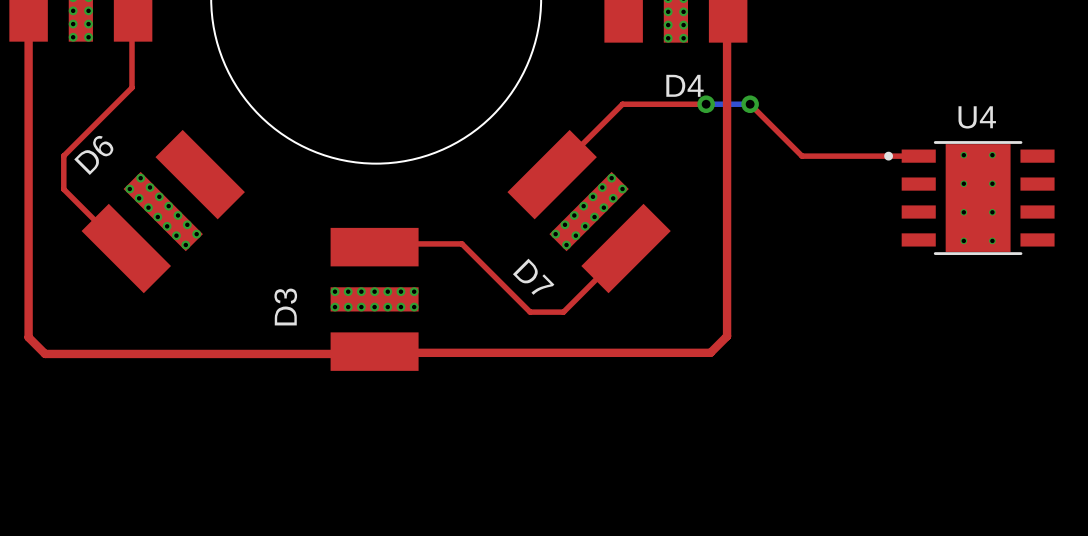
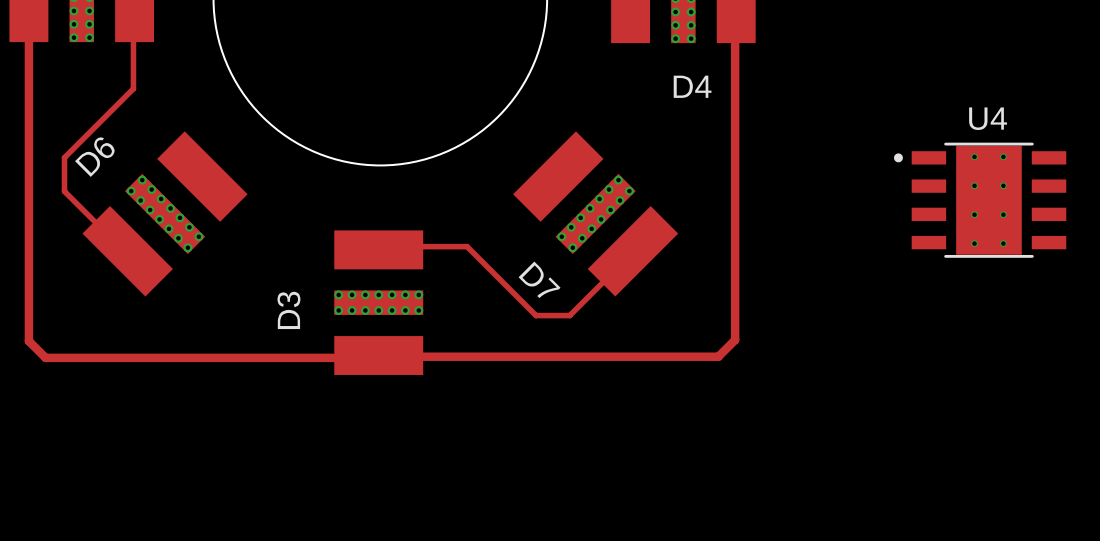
top track: (706, 104) (622, 104) (552, 174) -> none
bottom track: (706, 104) (750, 104) -> none
via: (706, 104) -> none
top track: (750, 104) (802, 156) (918, 156) -> none
via: (750, 104) -> none

